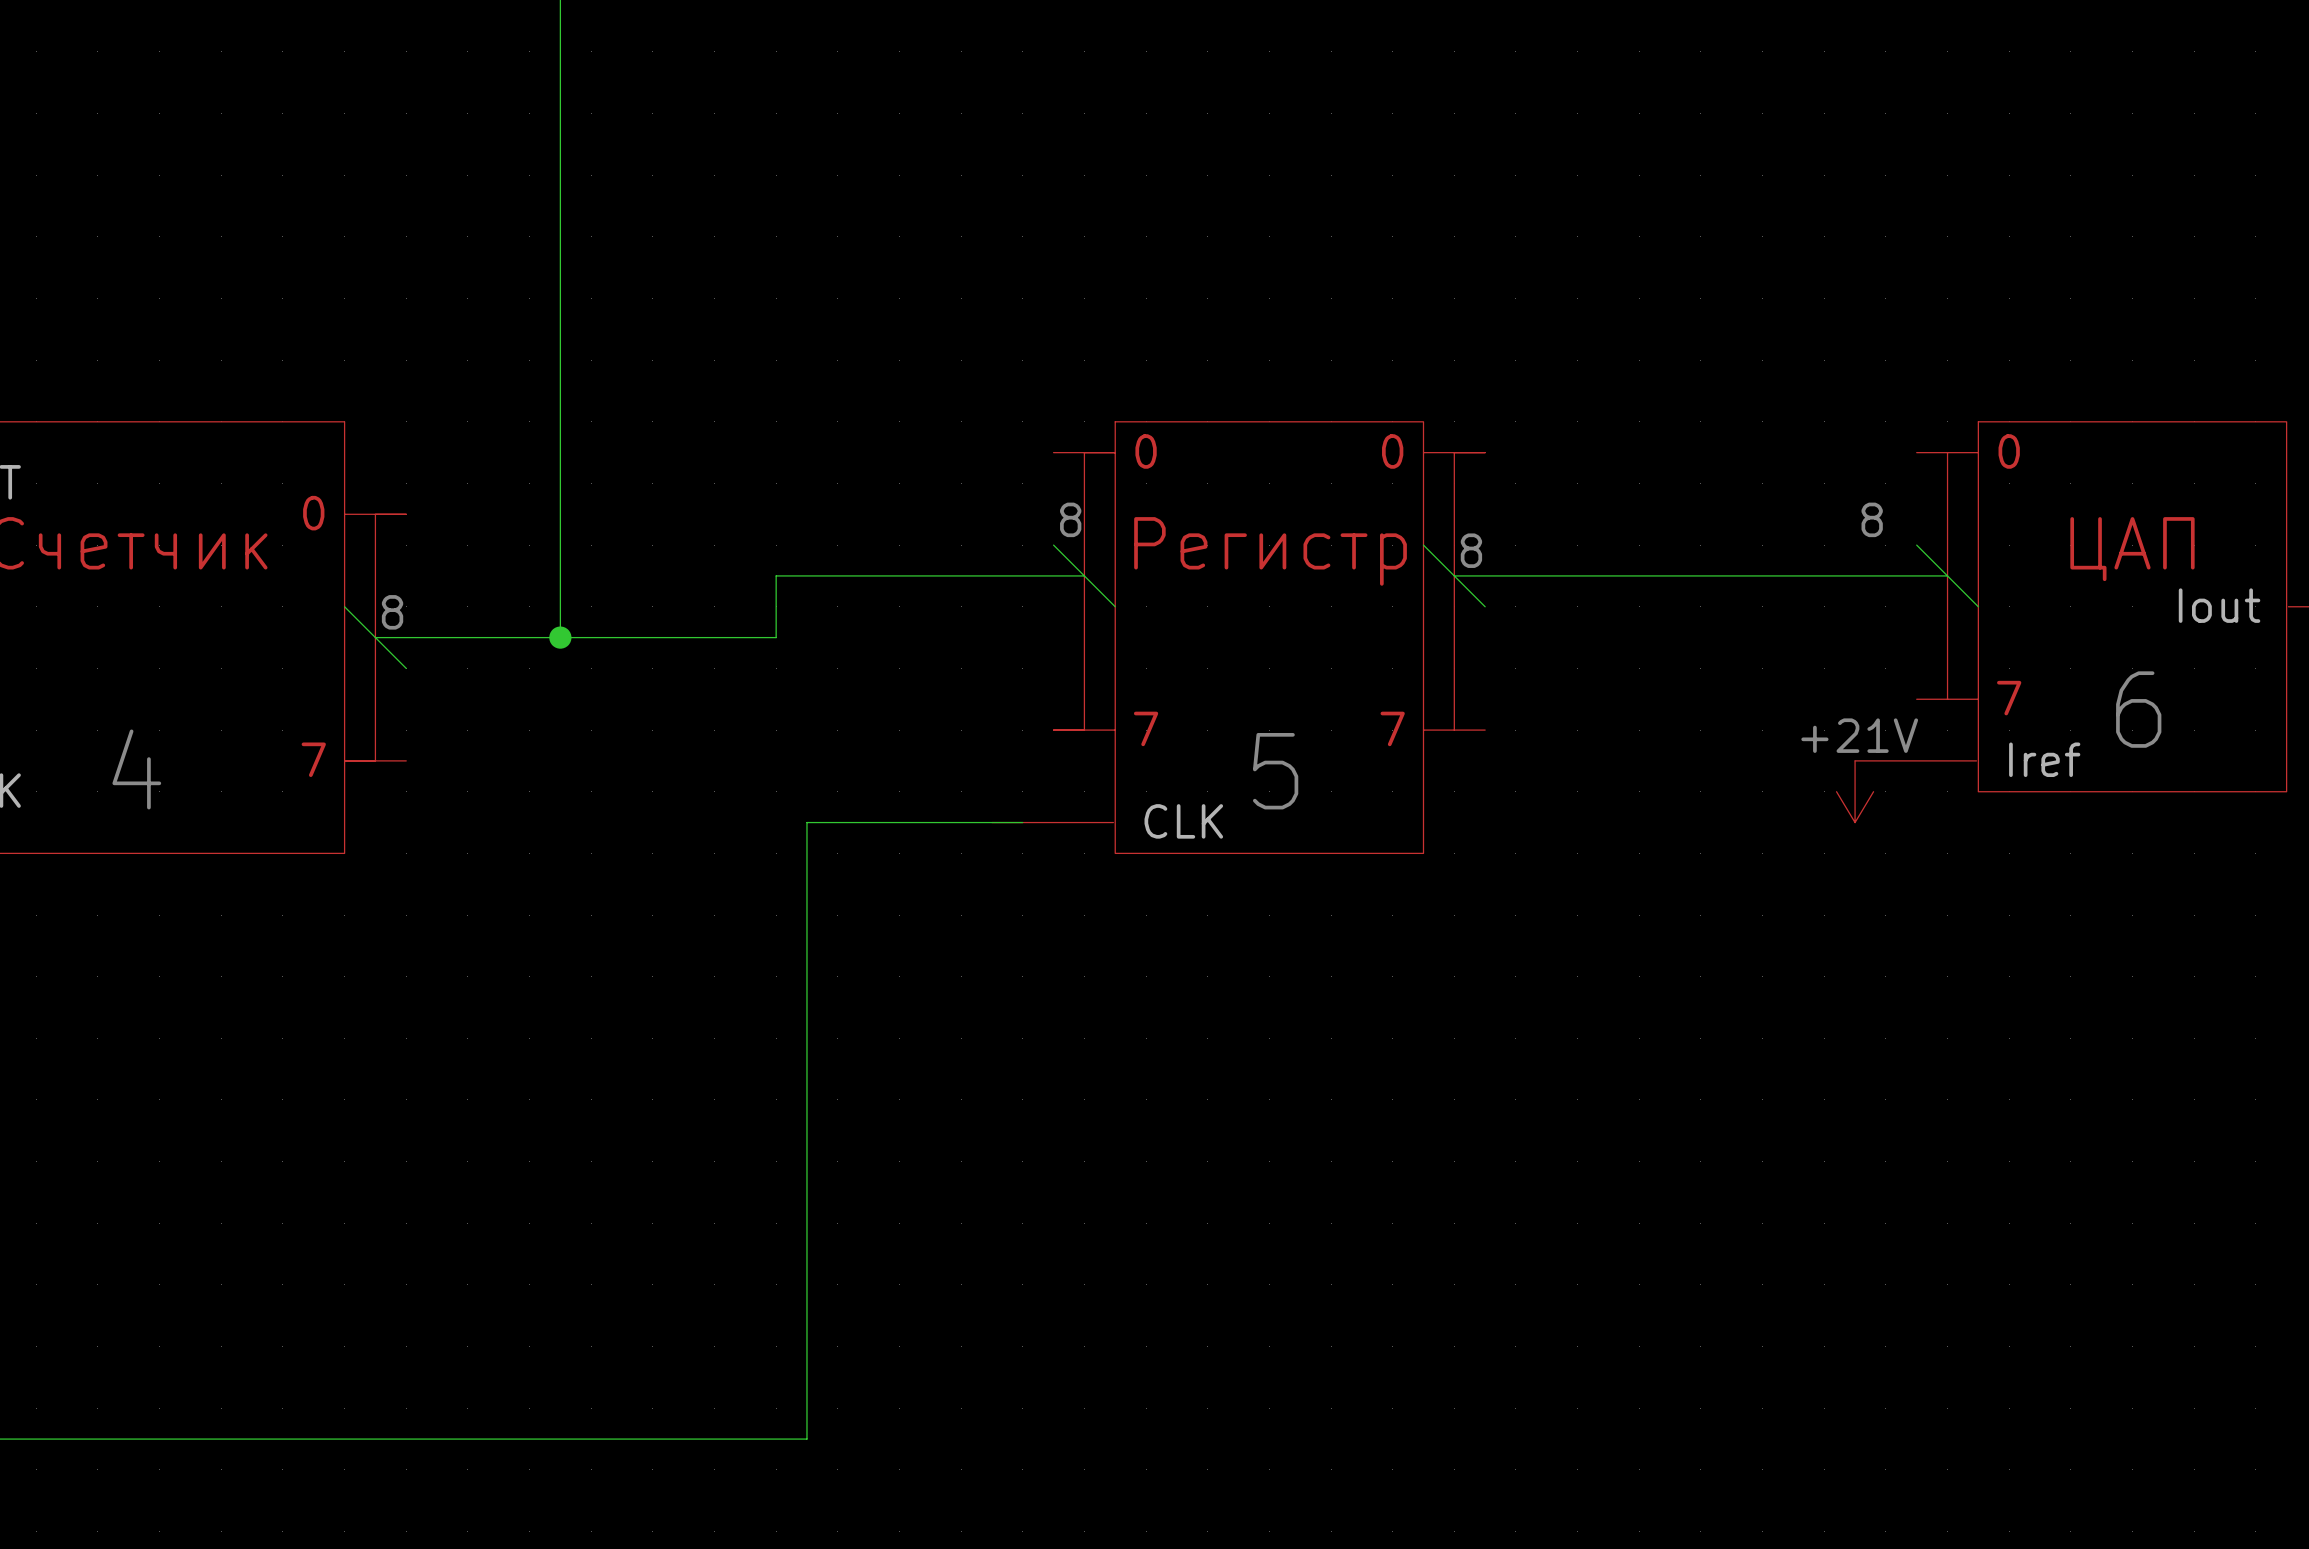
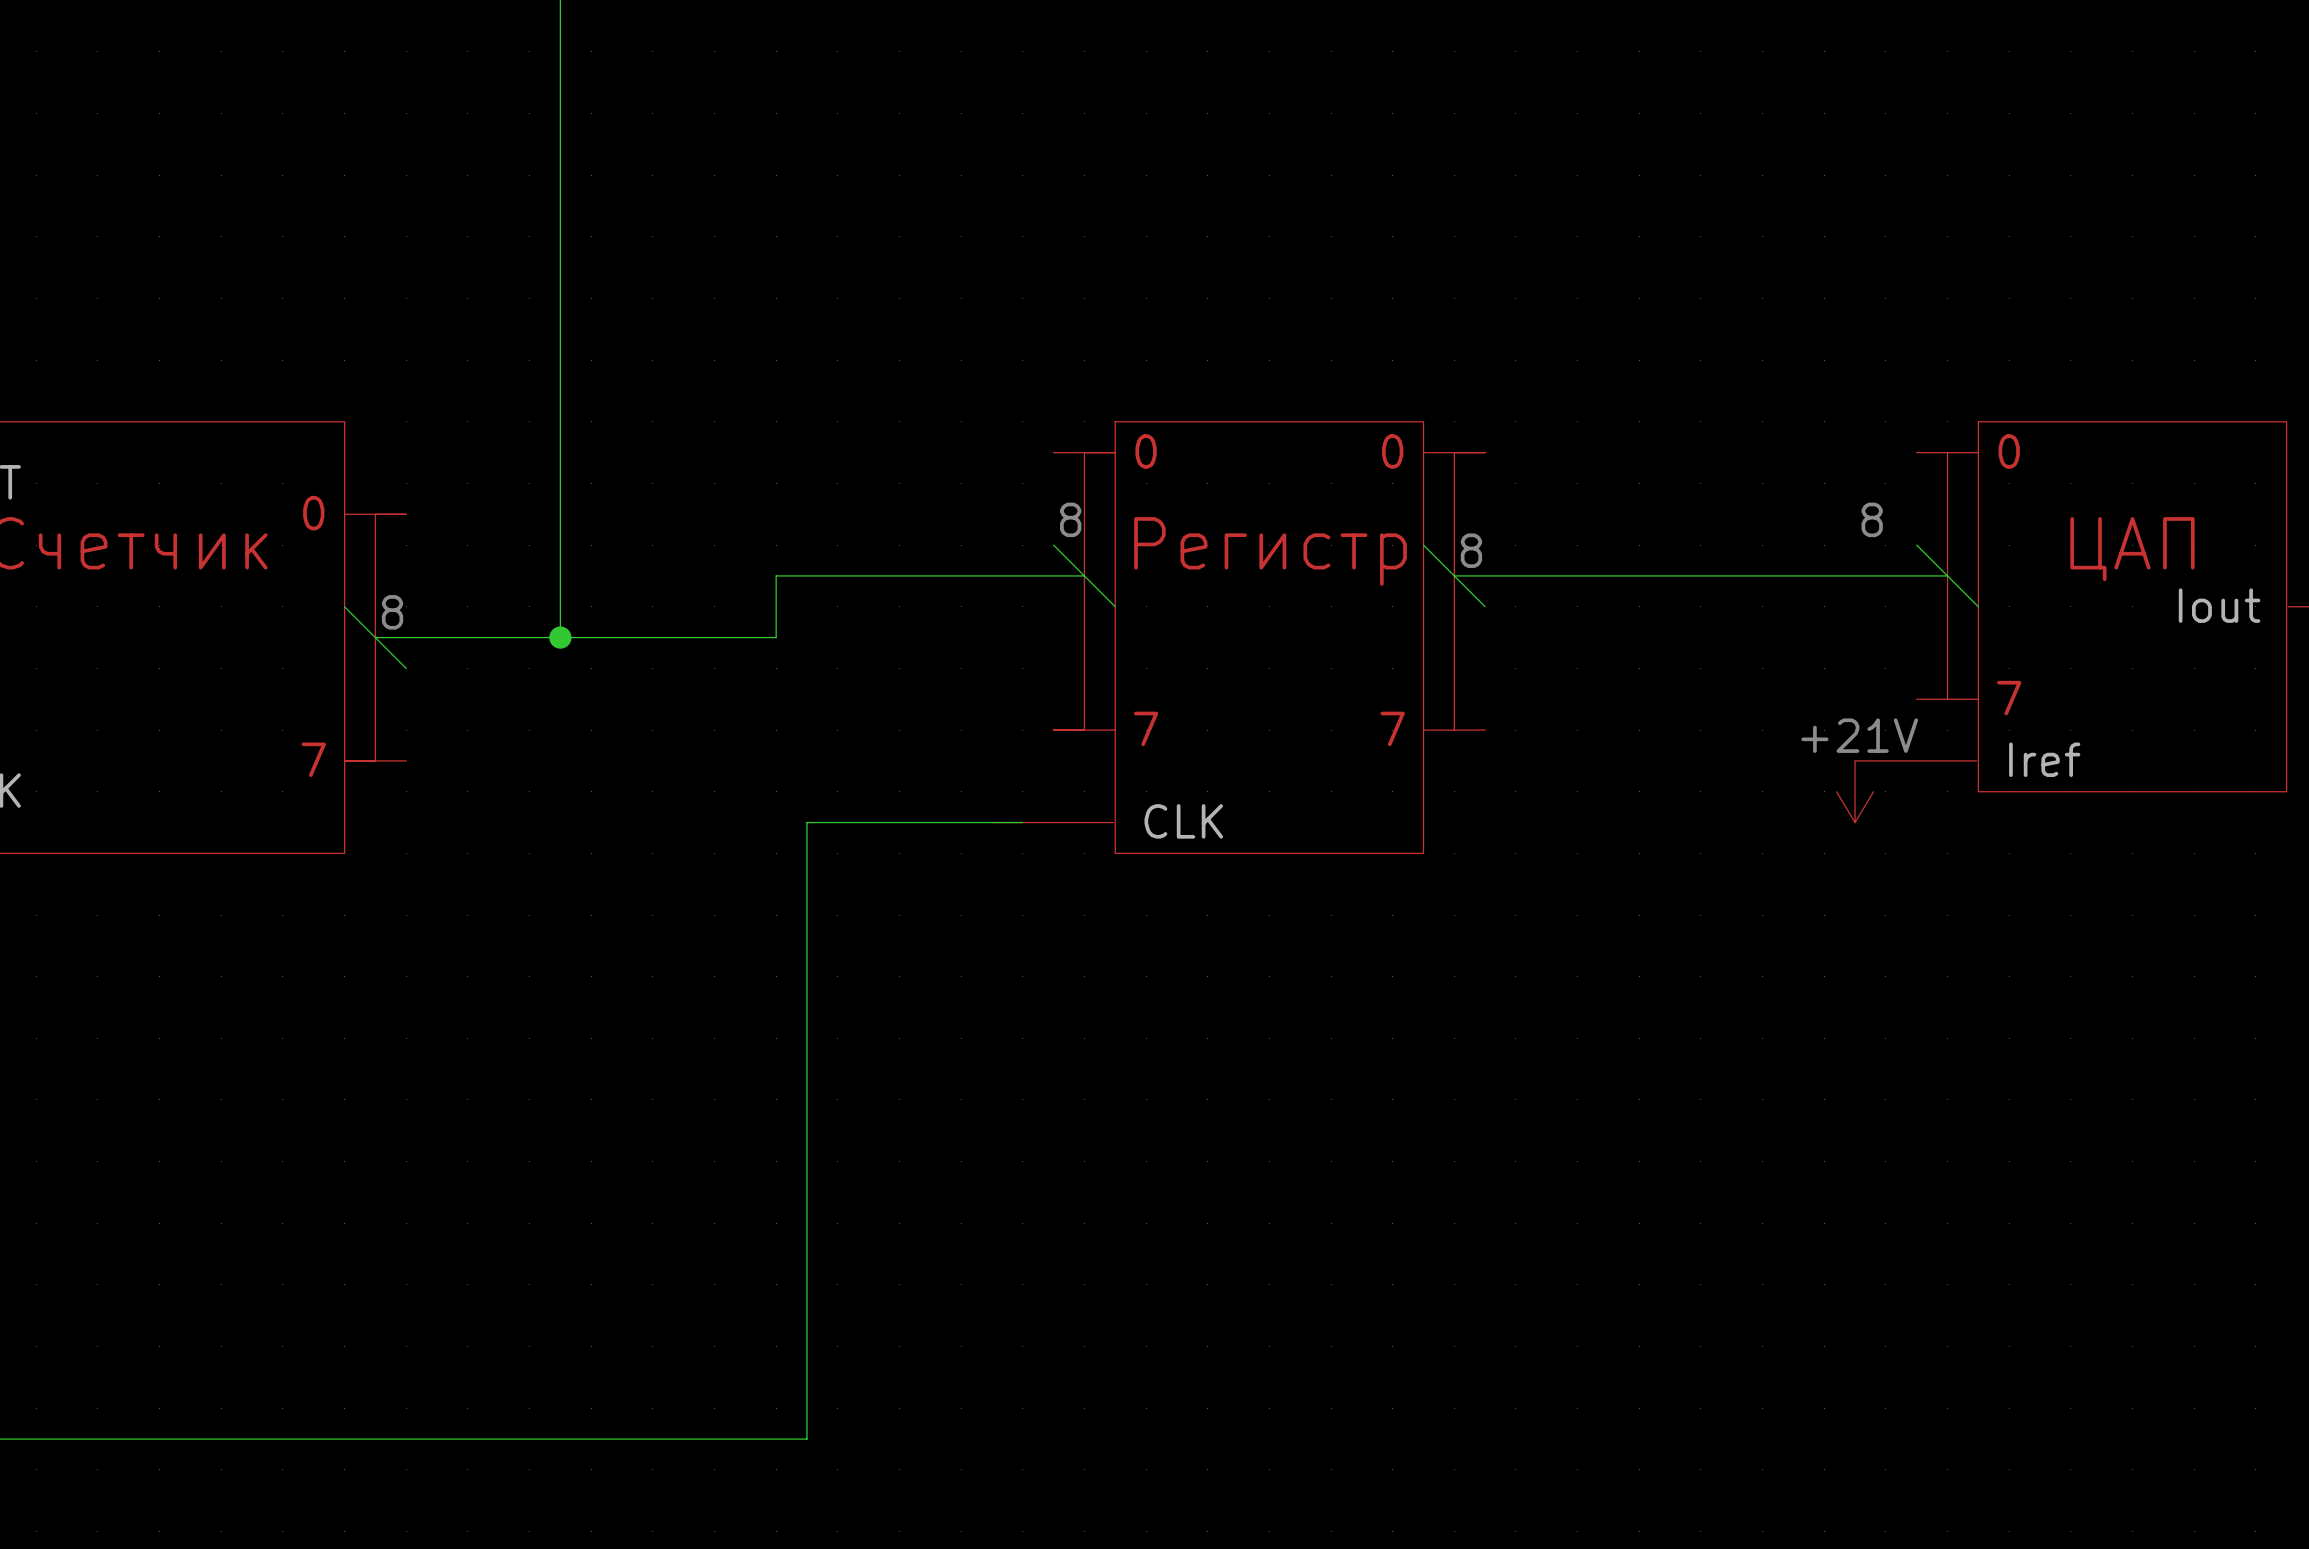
text: 6 (2138, 709) -> none
text: 4 (136, 769) -> none
text: 5 (1275, 771) -> none

